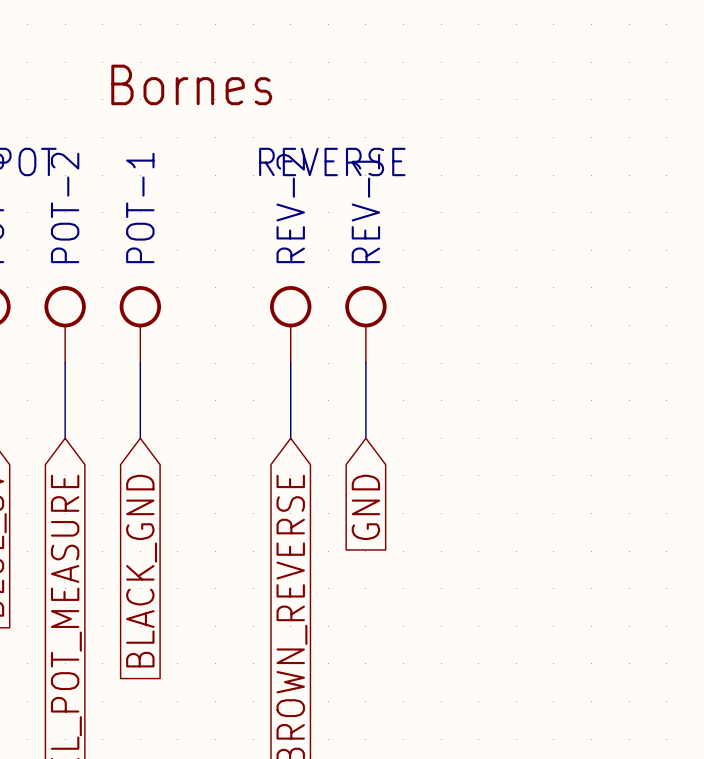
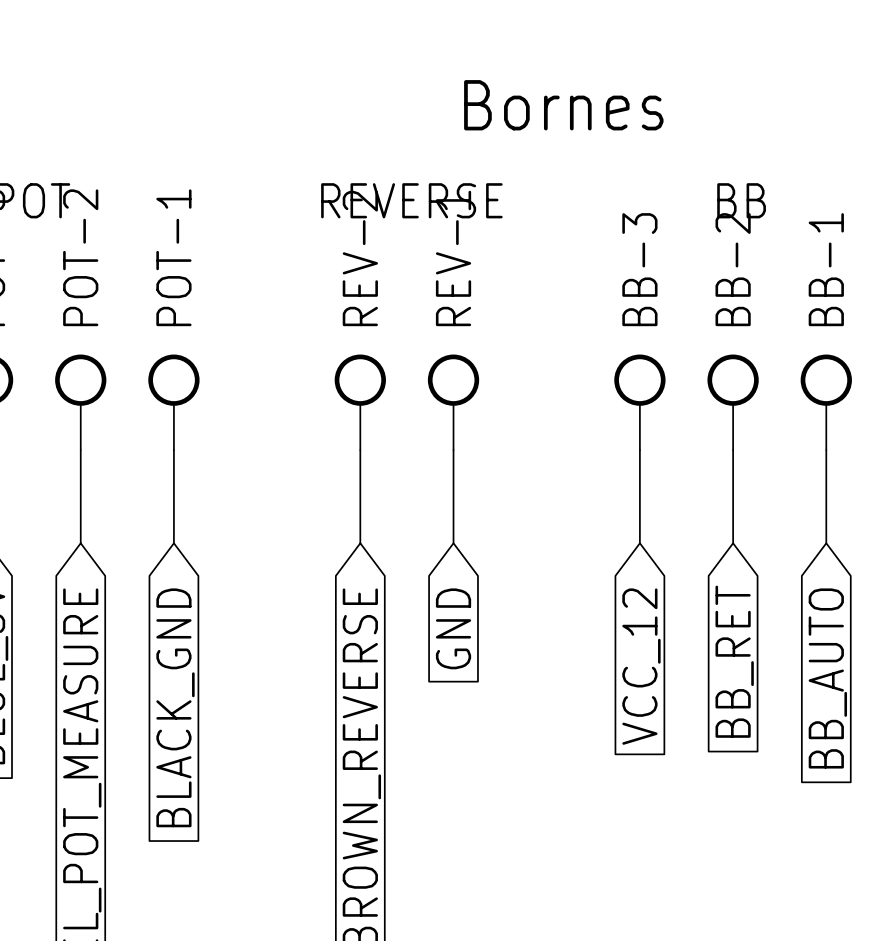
text position: Bornes (191, 84) -> Bornes (563, 105)
text: none -> BB (741, 200)
BB-3: none -> (639, 402)
BB-2: none -> (733, 402)
BB-1: none -> (826, 402)
wire: none -> (639, 450) (639, 543)
wire: none -> (733, 450) (733, 543)
wire: none -> (826, 450) (826, 543)
global label: none -> BB_RET (734, 661)
global label: none -> VCC_12 (641, 666)
global label: none -> BB_AUTO (827, 678)

